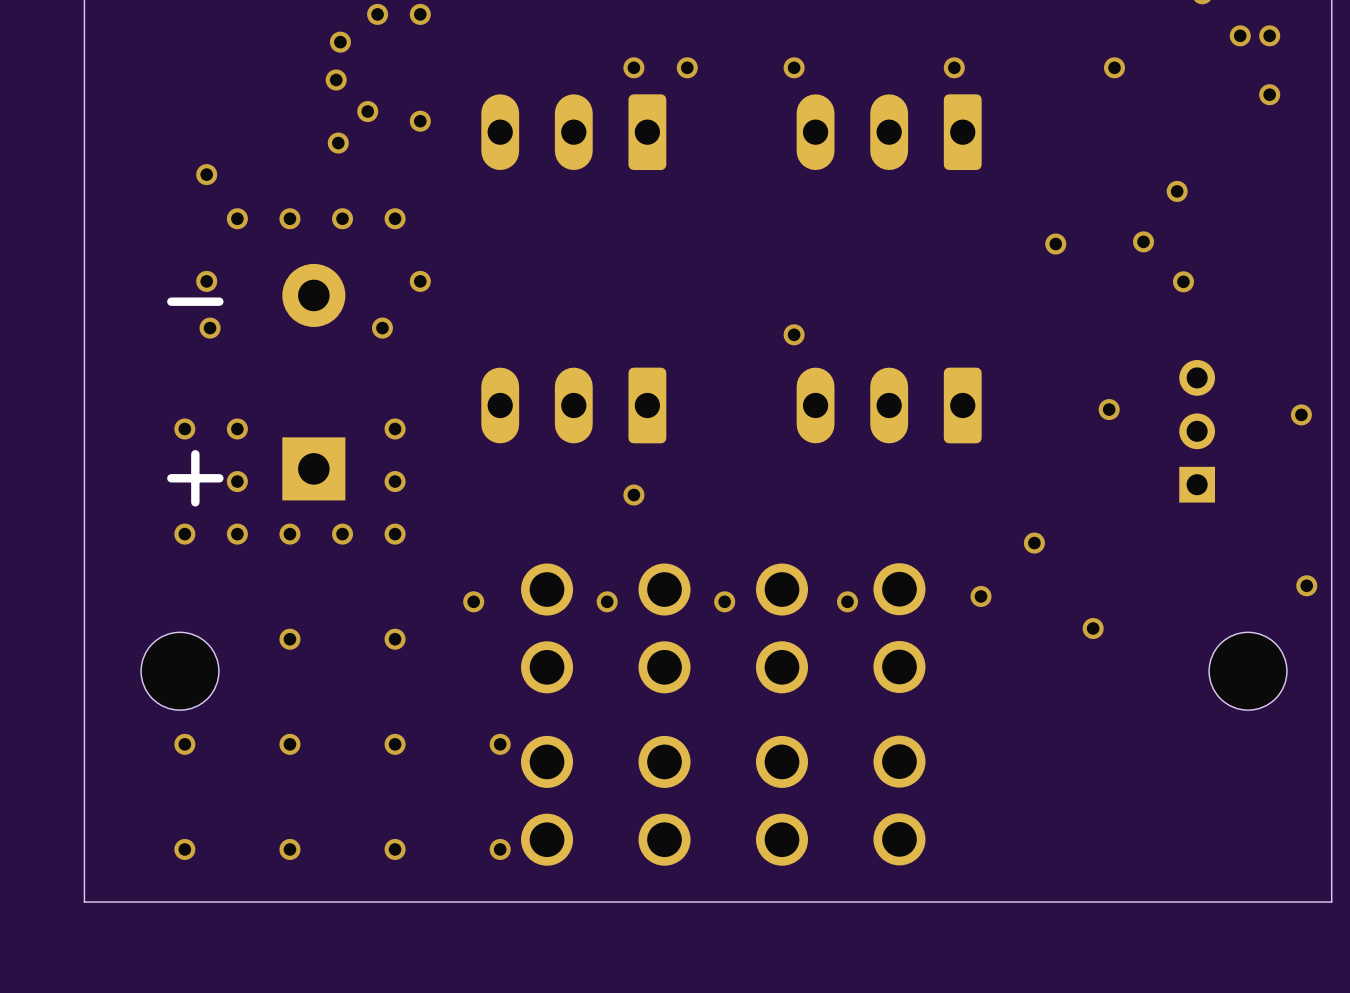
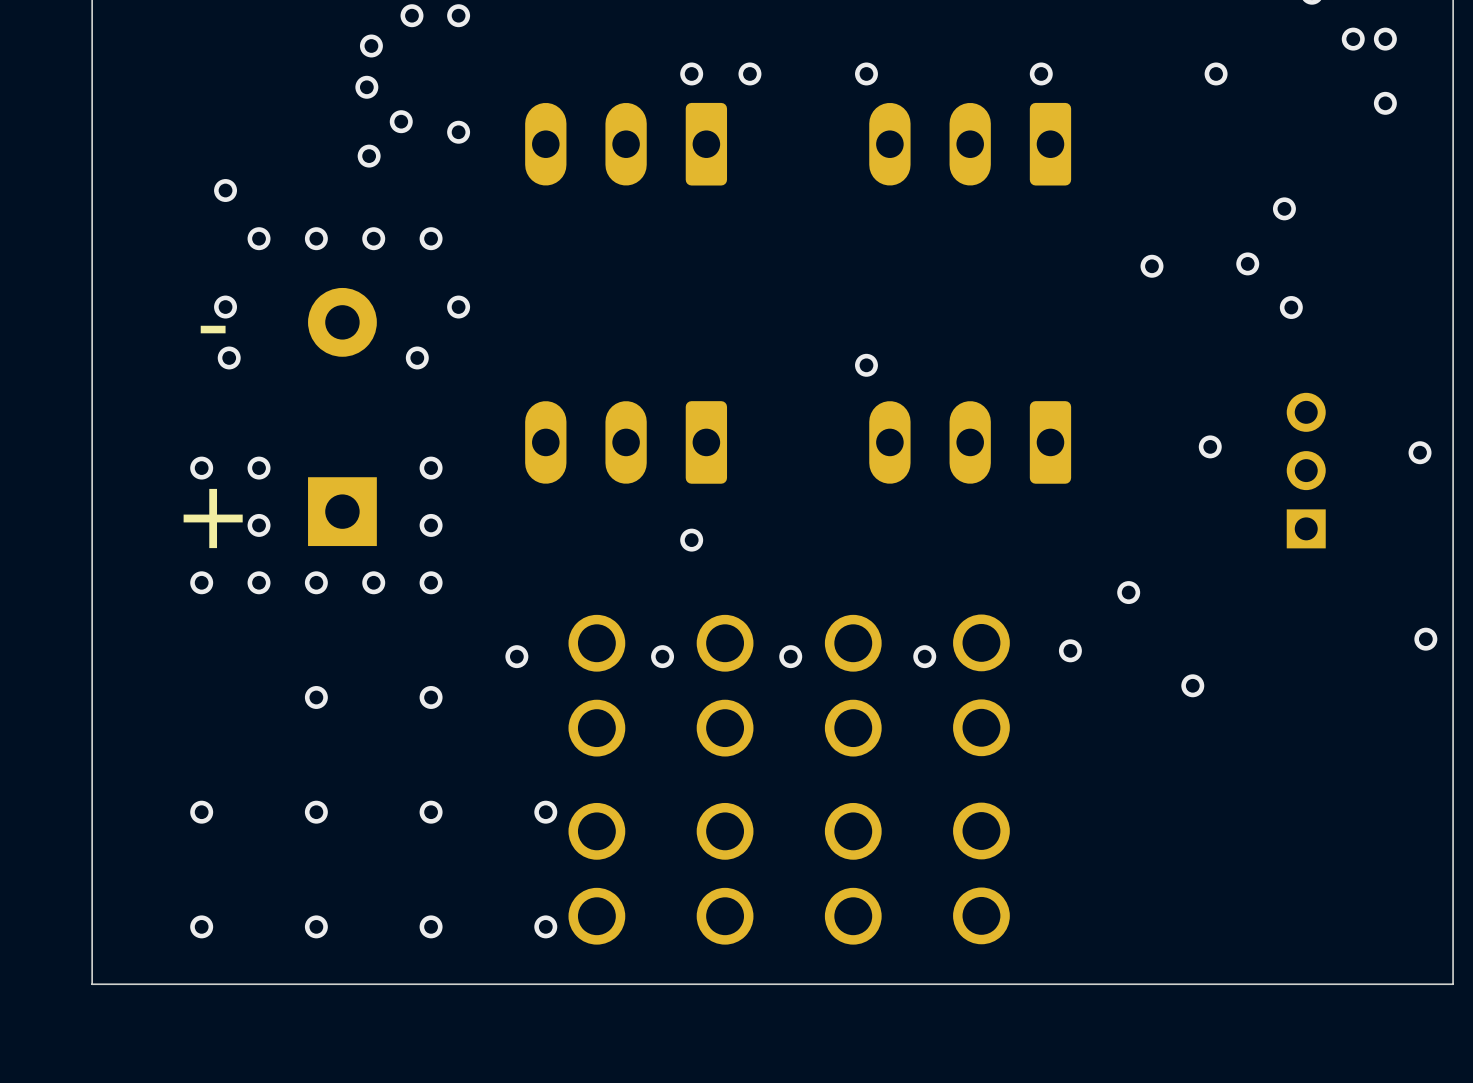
part: (180, 671) -> none
part: (1248, 671) -> none

